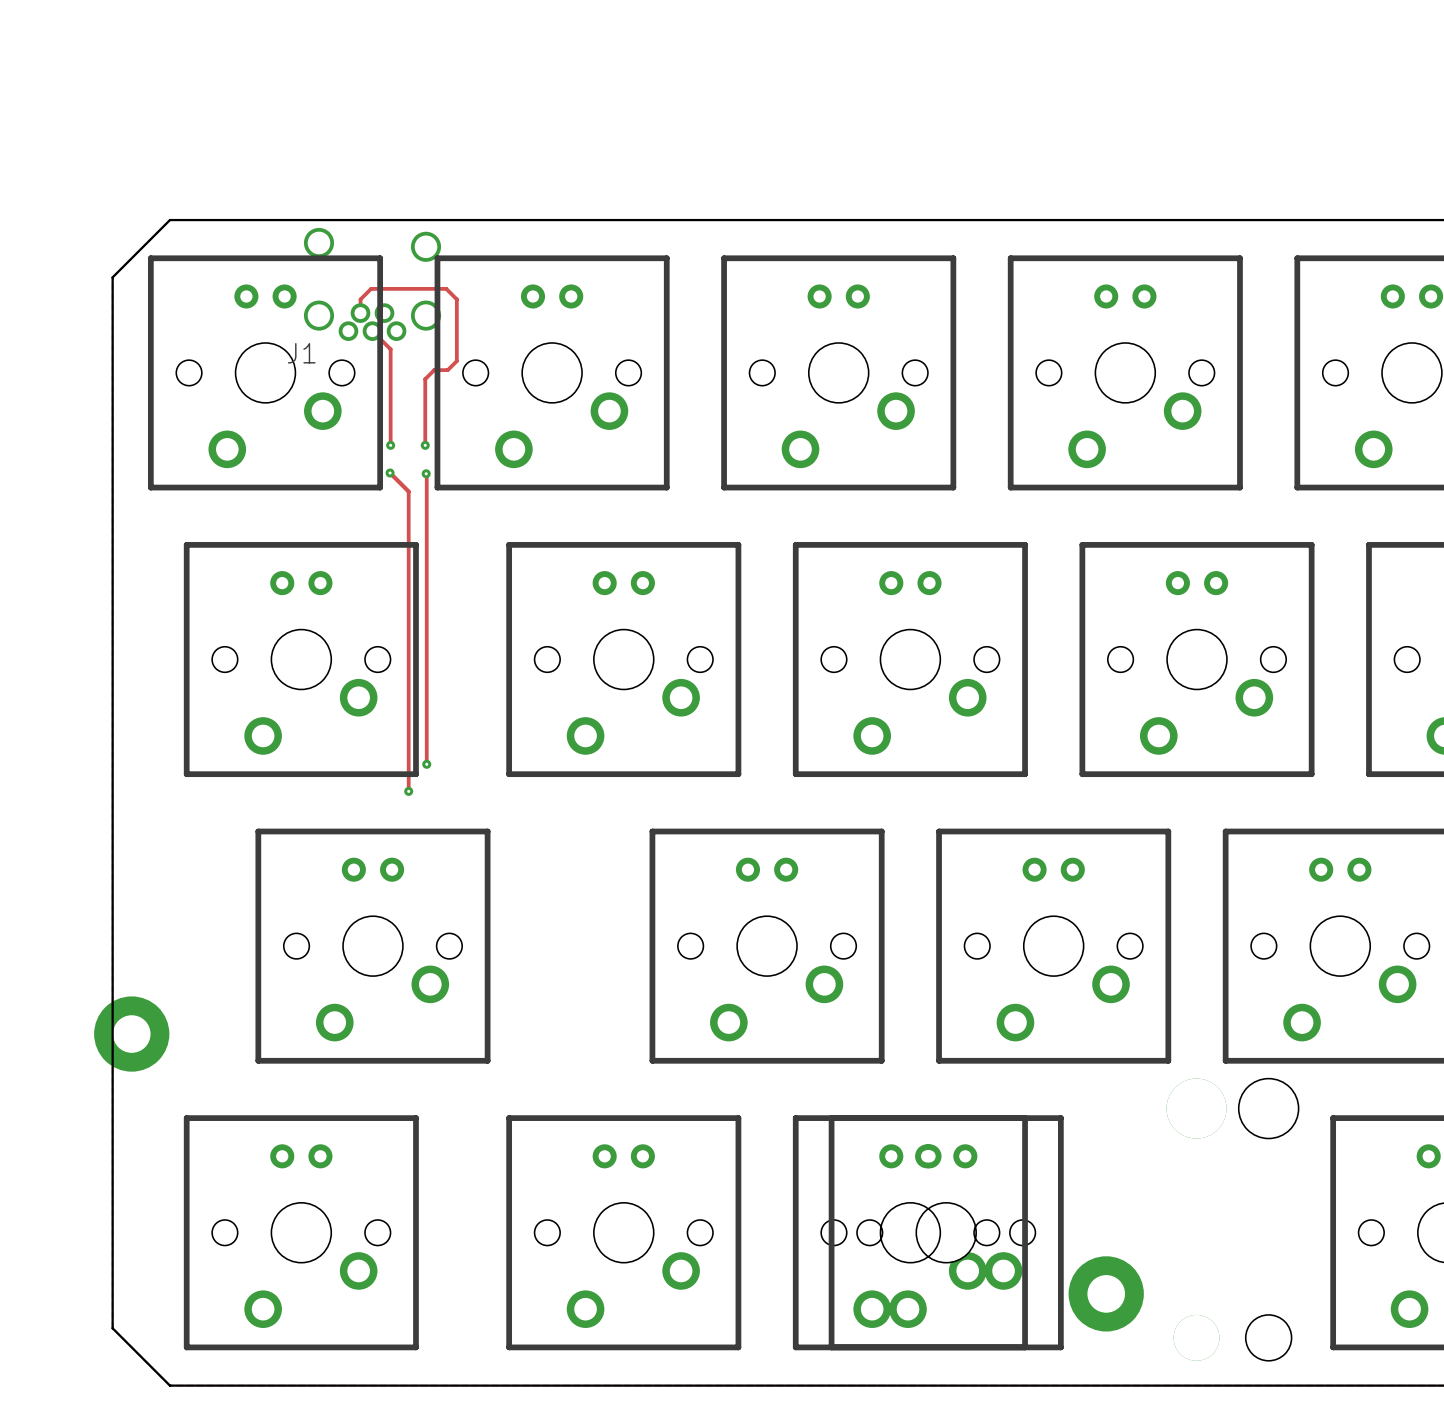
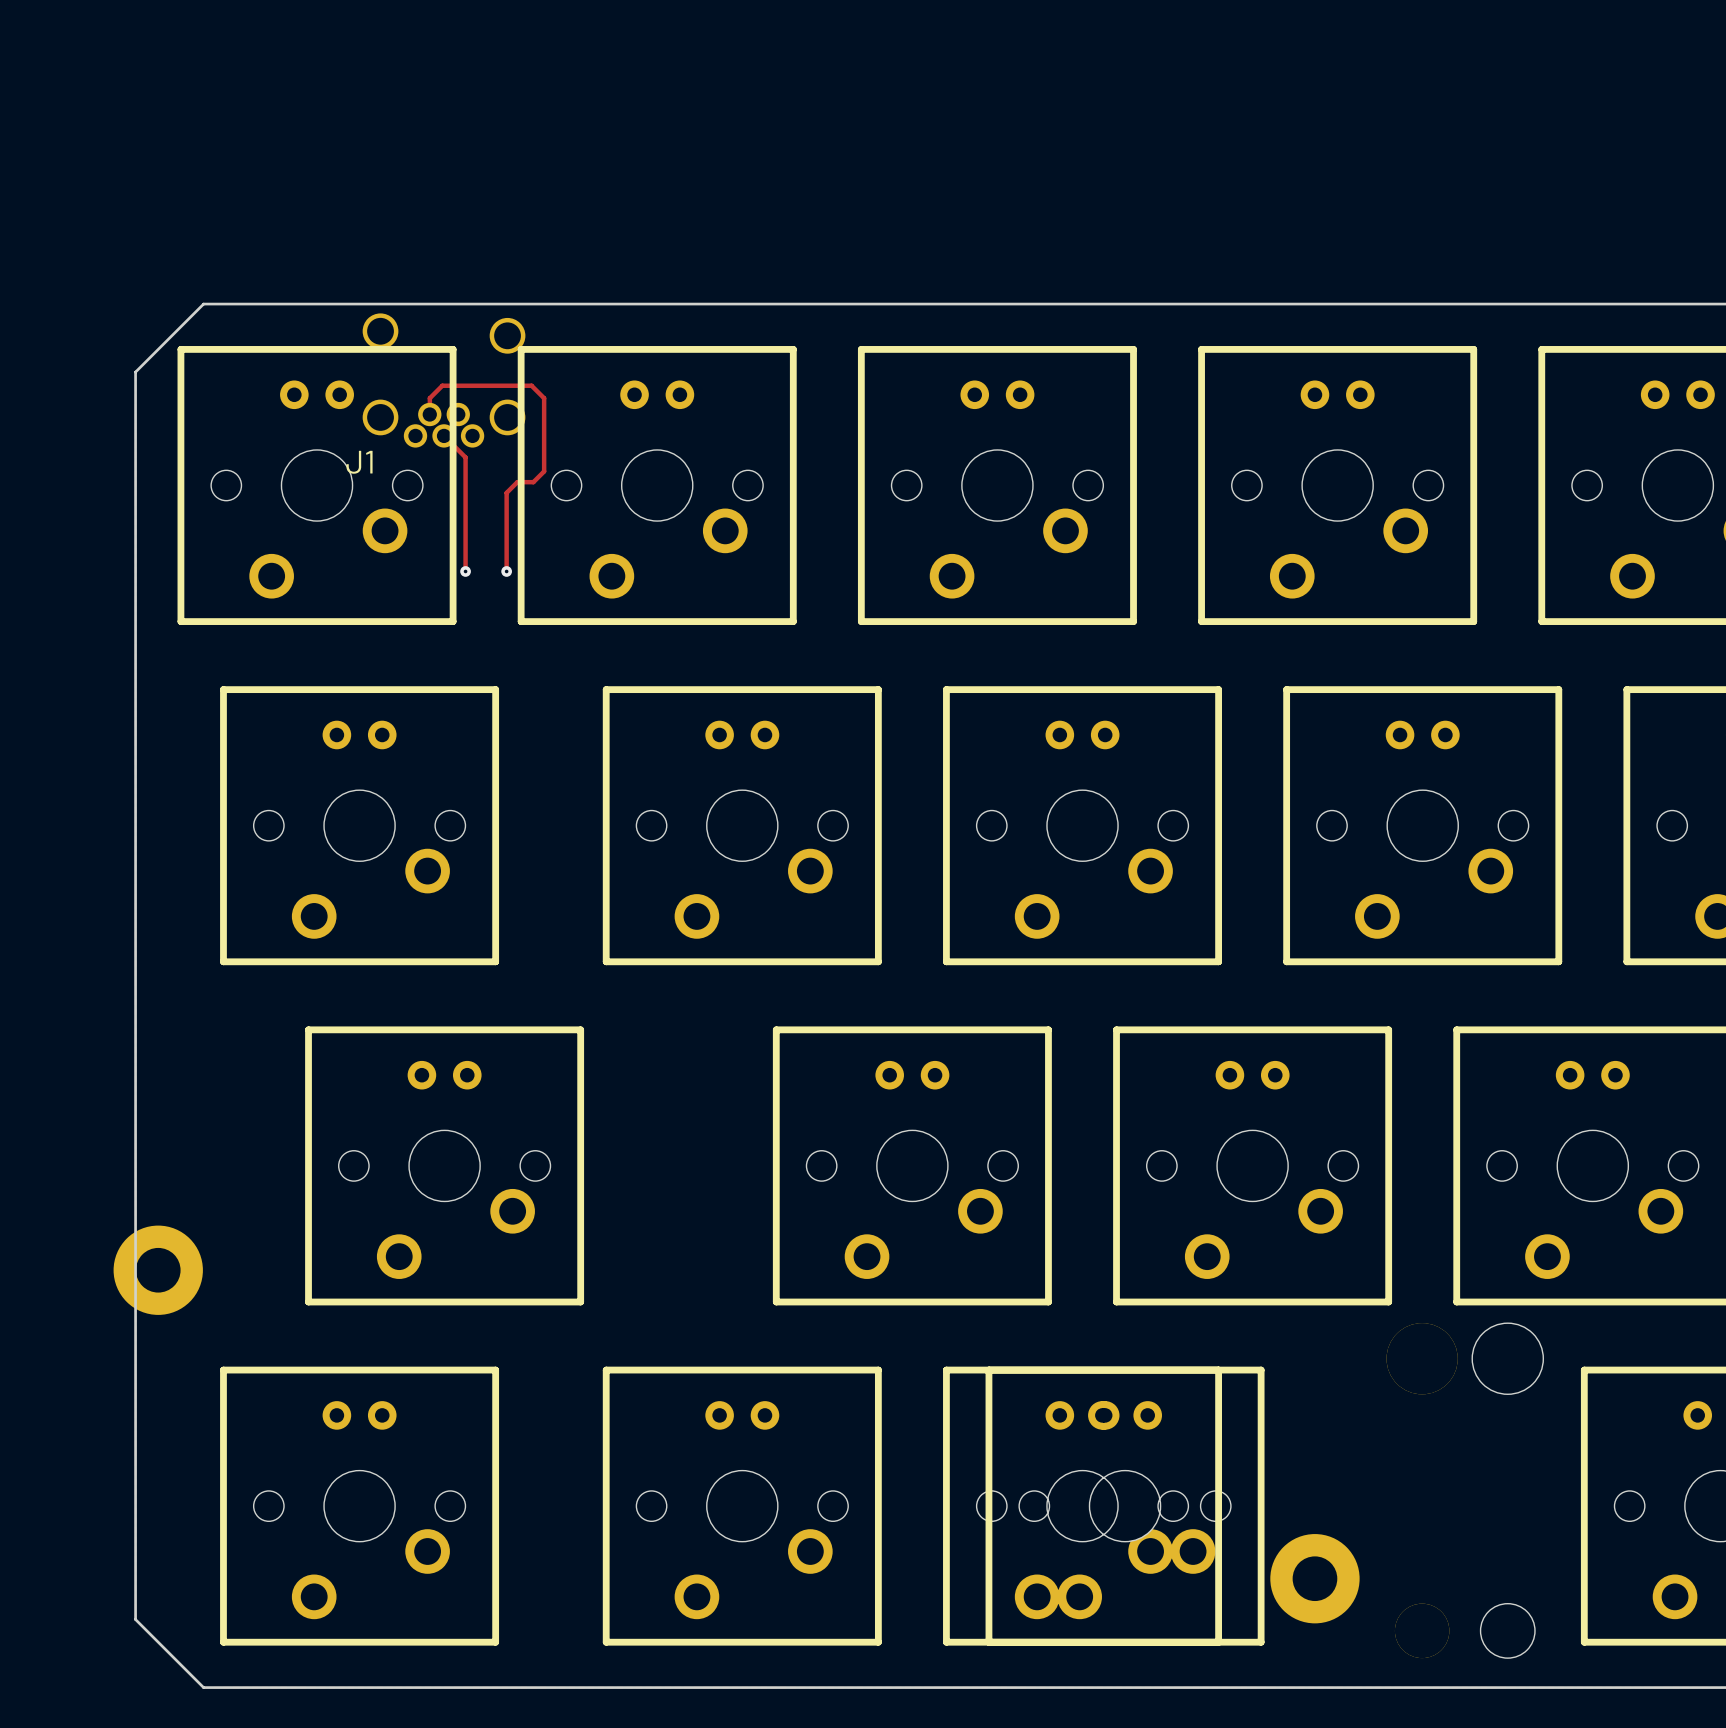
track: (390, 473) (408, 491) (408, 791) -> none
via: (390, 473) -> none
track: (426, 473) (426, 764) -> none
via: (426, 473) -> none
via: (426, 764) -> none
via: (408, 791) -> none

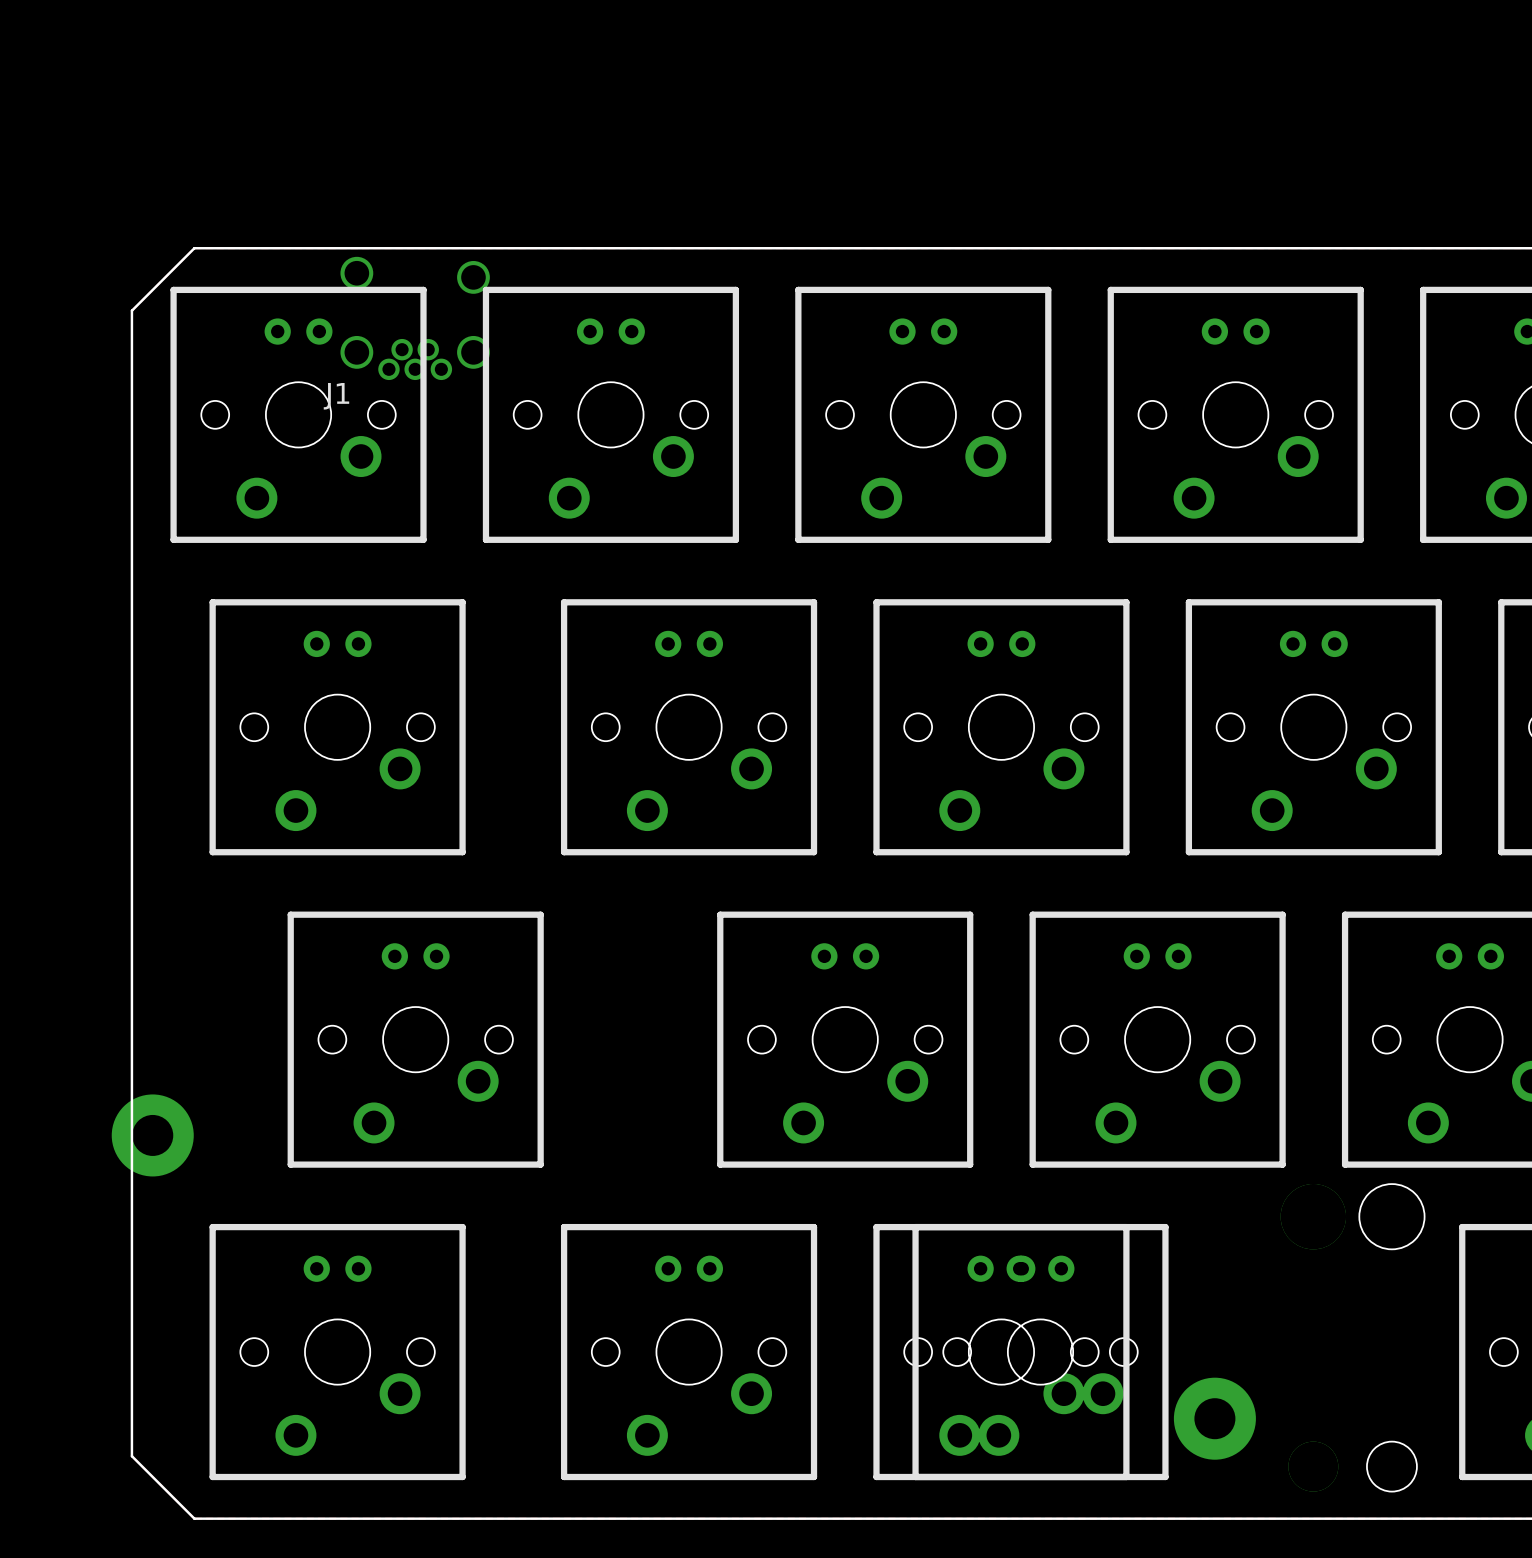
track: (429, 414) (429, 398) (442, 385) (531, 385) (544, 398) (544, 471) (533, 482) (517, 482) (506, 492) (506, 571) -> none
track: (444, 435) (465, 457) (465, 571) -> none
via: (465, 571) -> none
via: (506, 571) -> none

